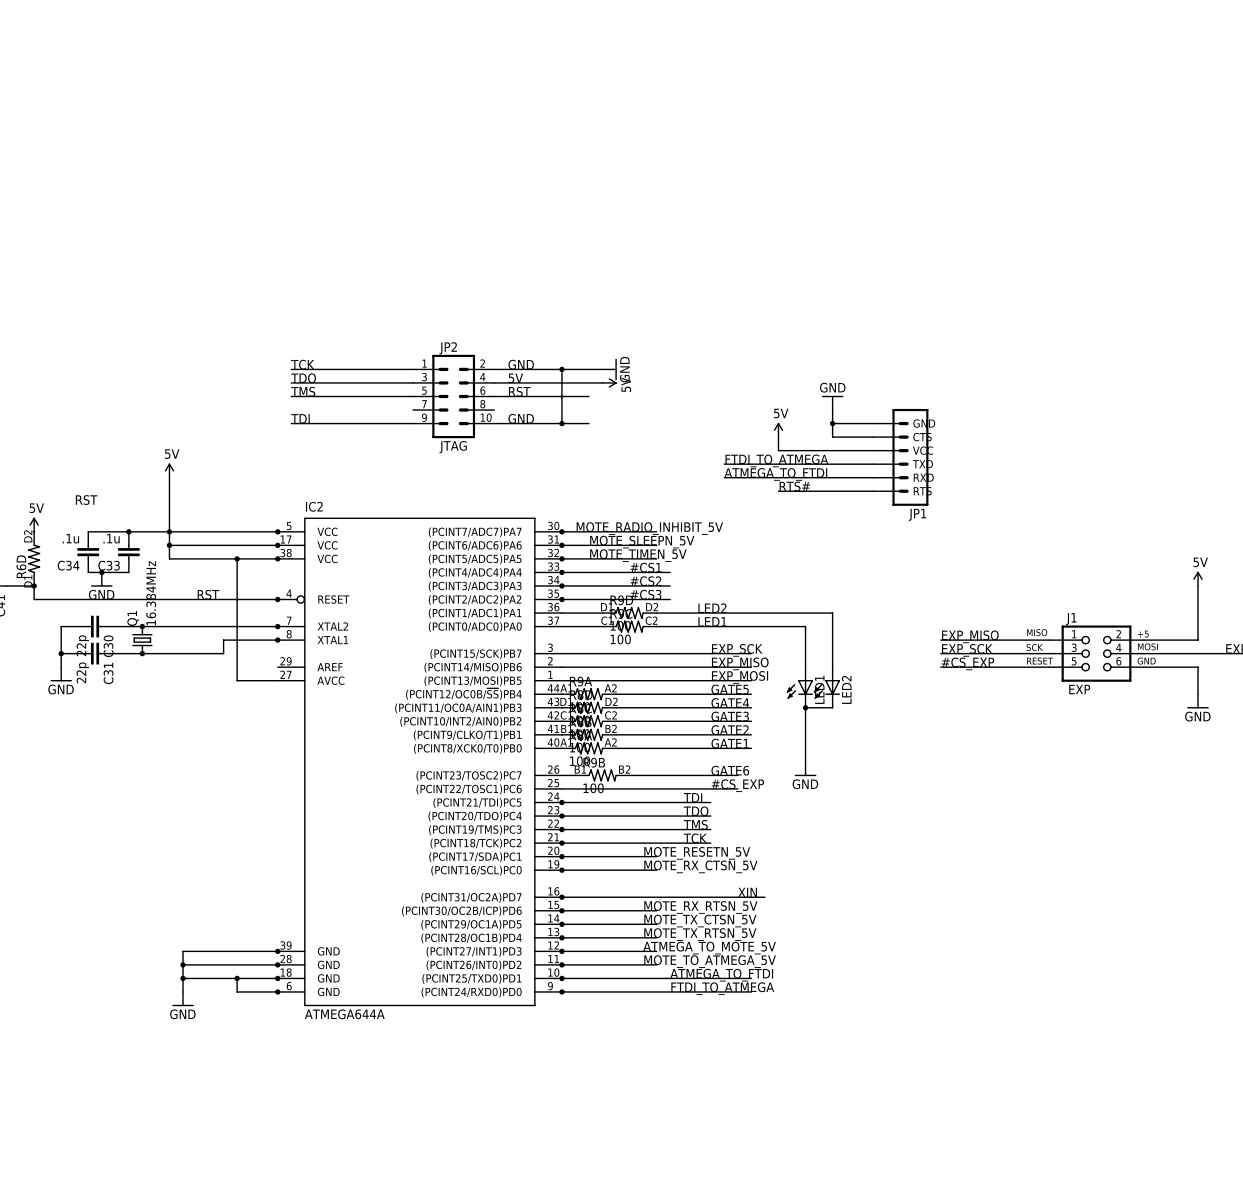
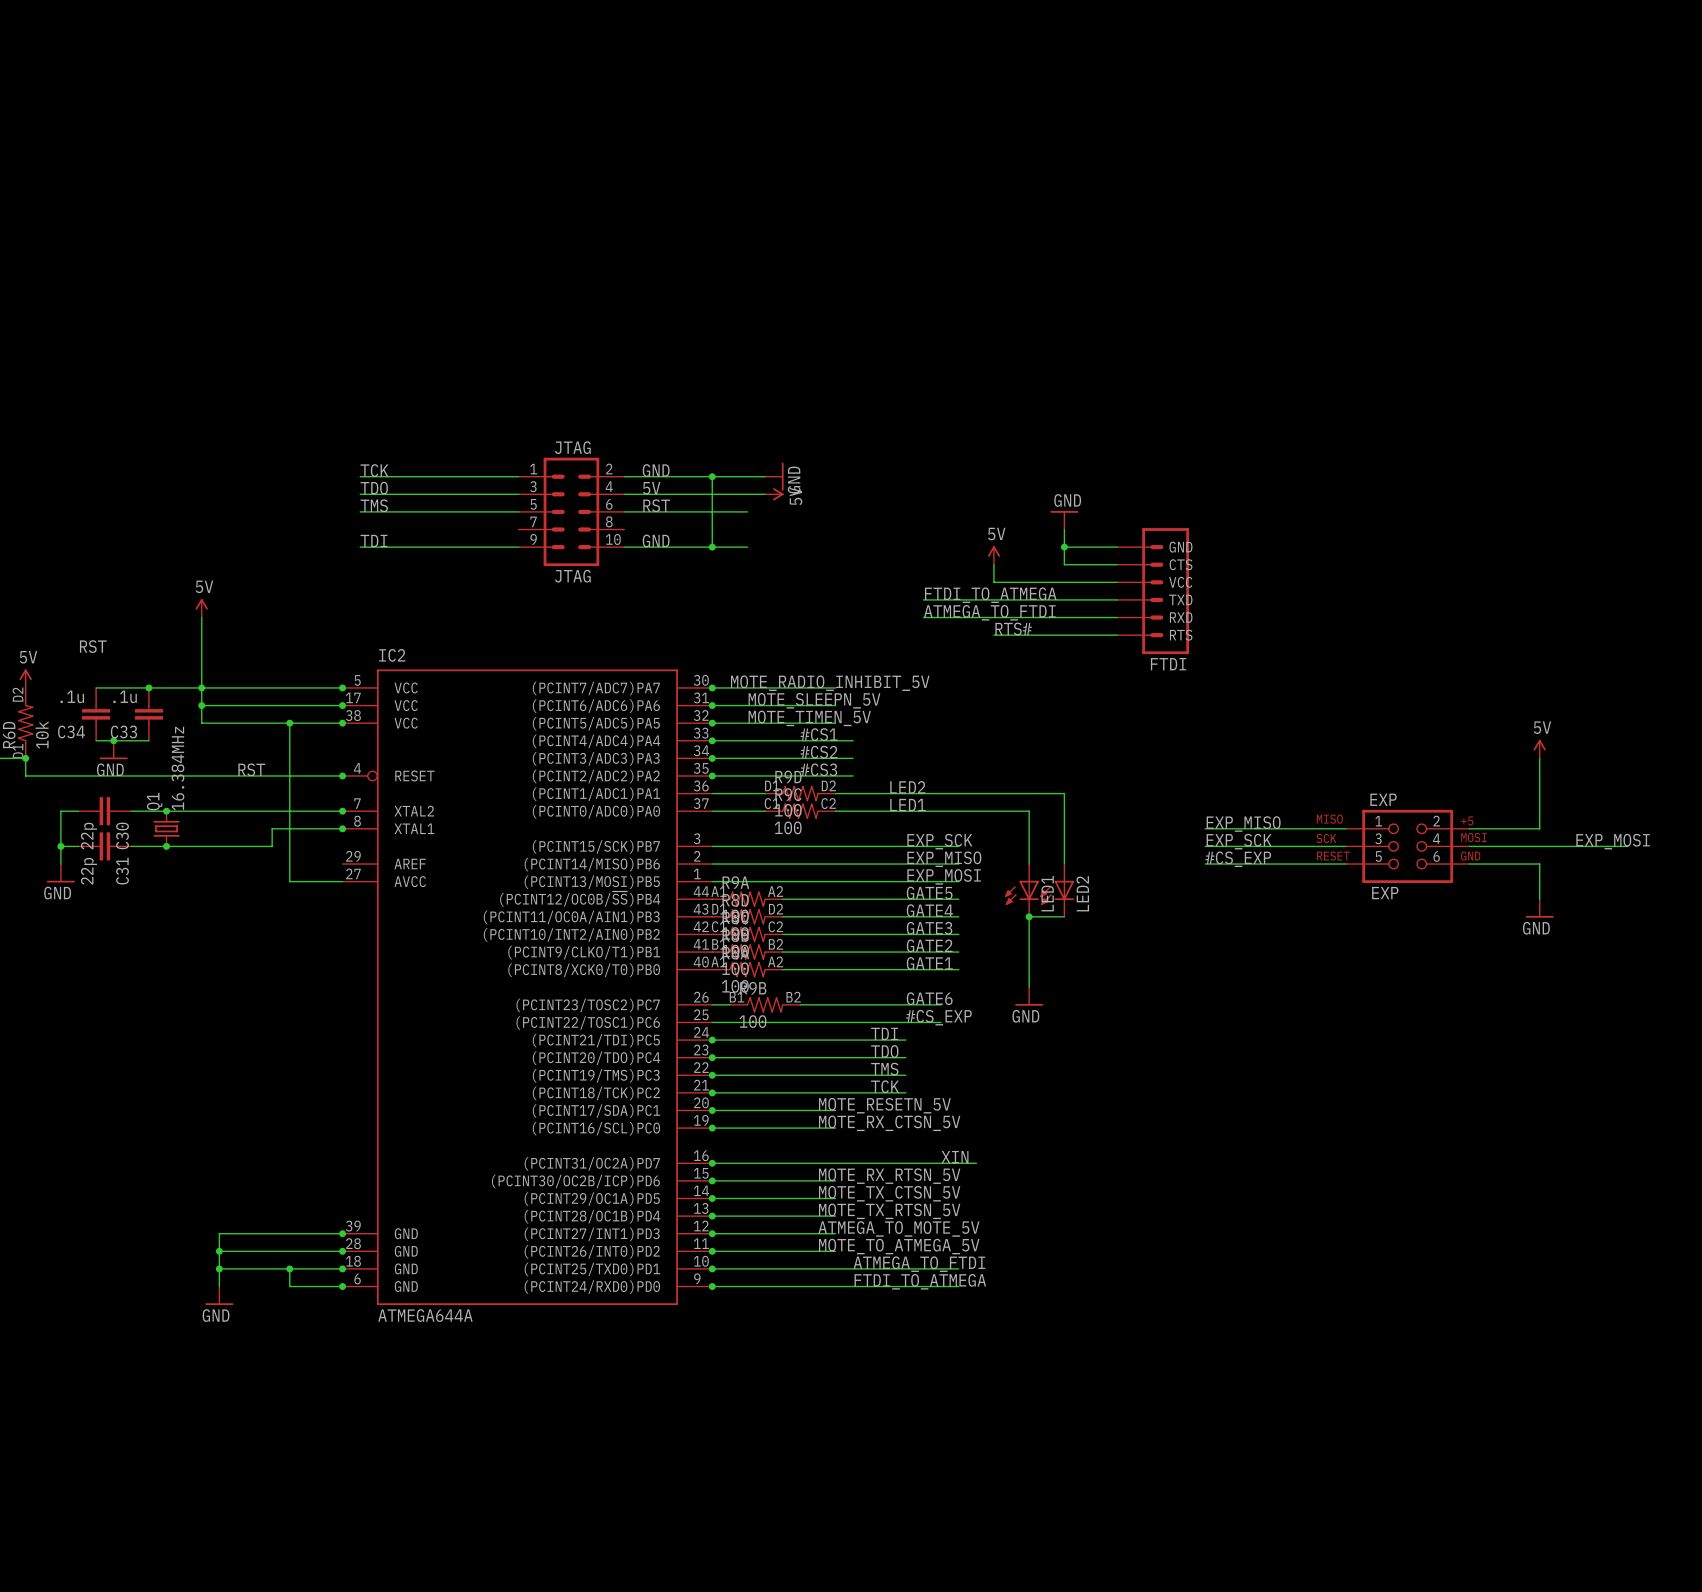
JP2 name: JP2 (448, 348) -> JTAG (572, 447)
JP1 name: JP1 (917, 514) -> FTDI (1168, 664)
R6D value: none -> 10k (42, 735)
J1 name: J1 (1071, 619) -> EXP (1383, 799)

